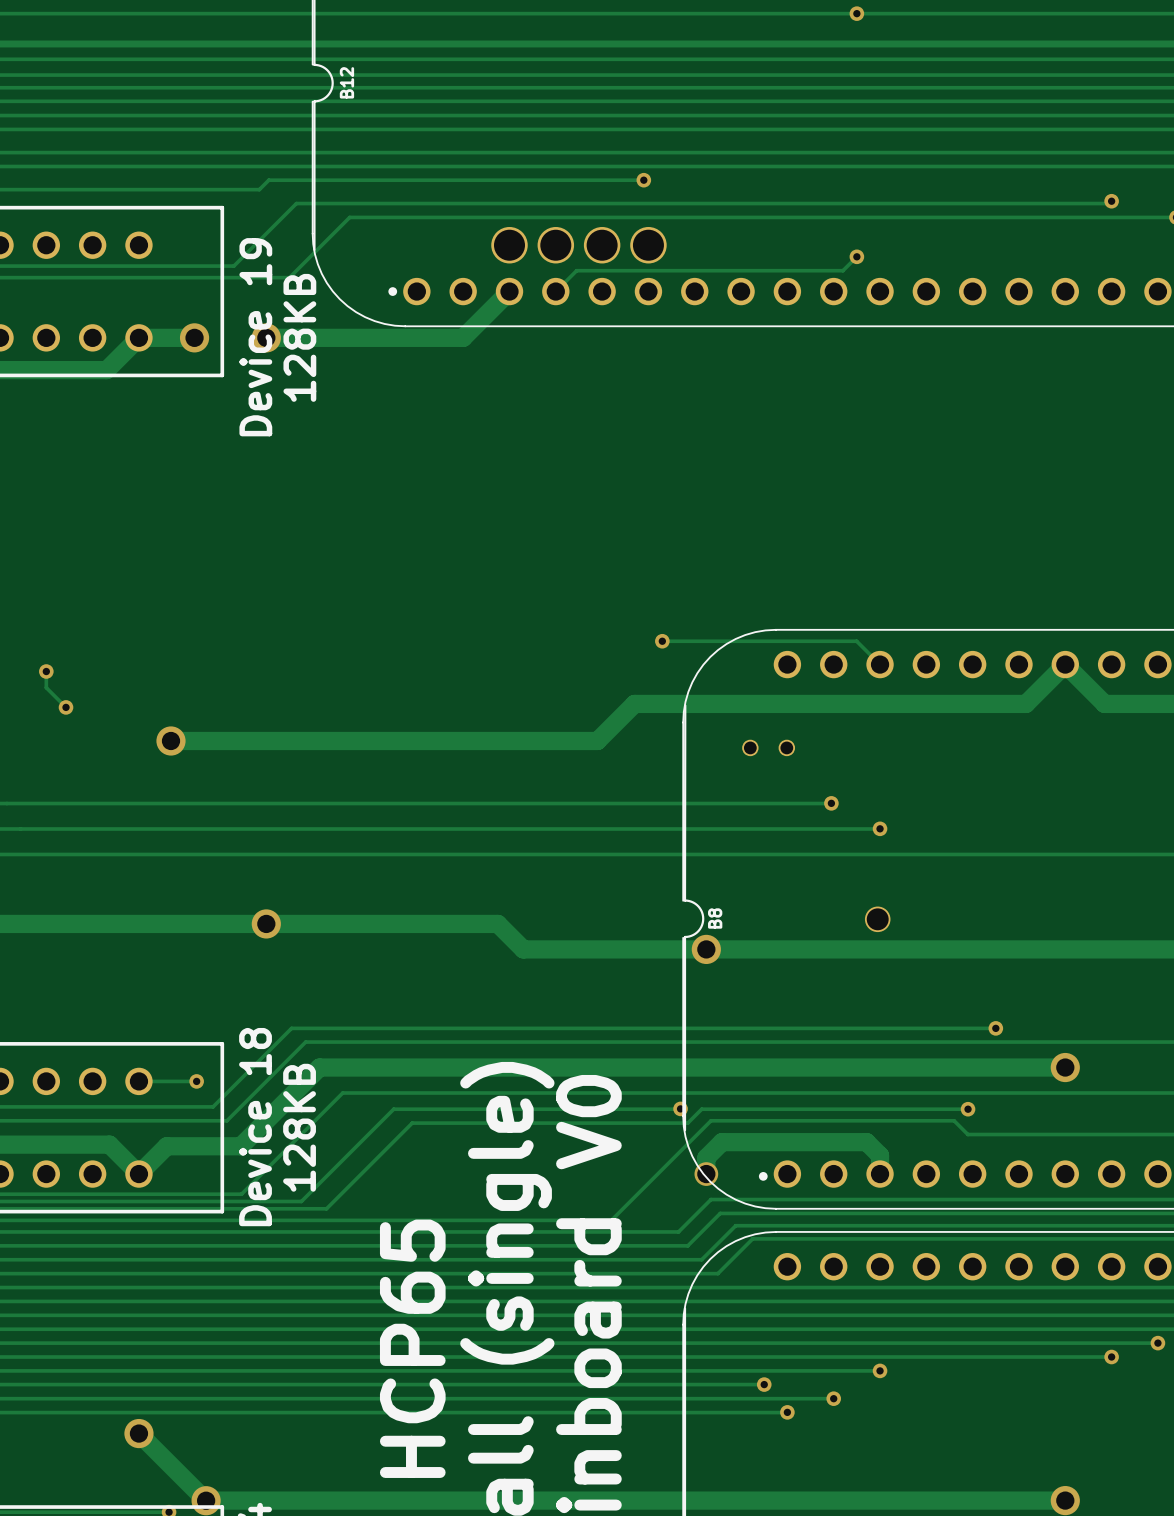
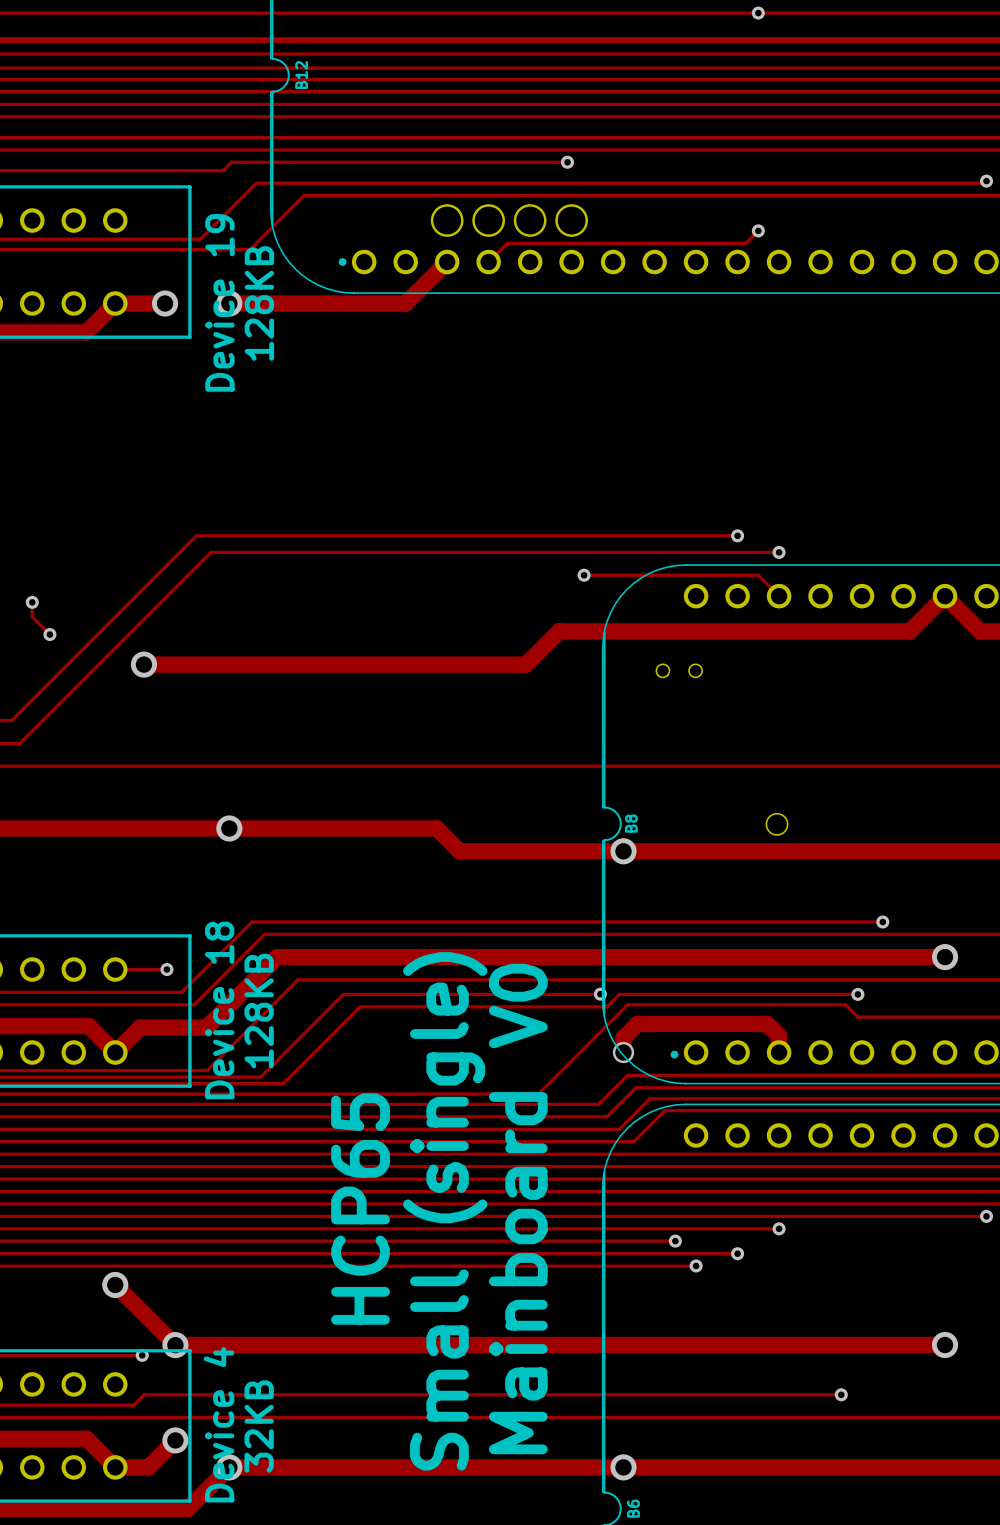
via: none -> (737, 535)
via: none -> (779, 552)
track: (23, 803) (831, 803) -> (11, 720) (196, 535) (737, 535)
via: (831, 803) -> none
track: (32, 828) (879, 828) -> (19, 743) (210, 552) (779, 552)
via: (880, 828) -> none

